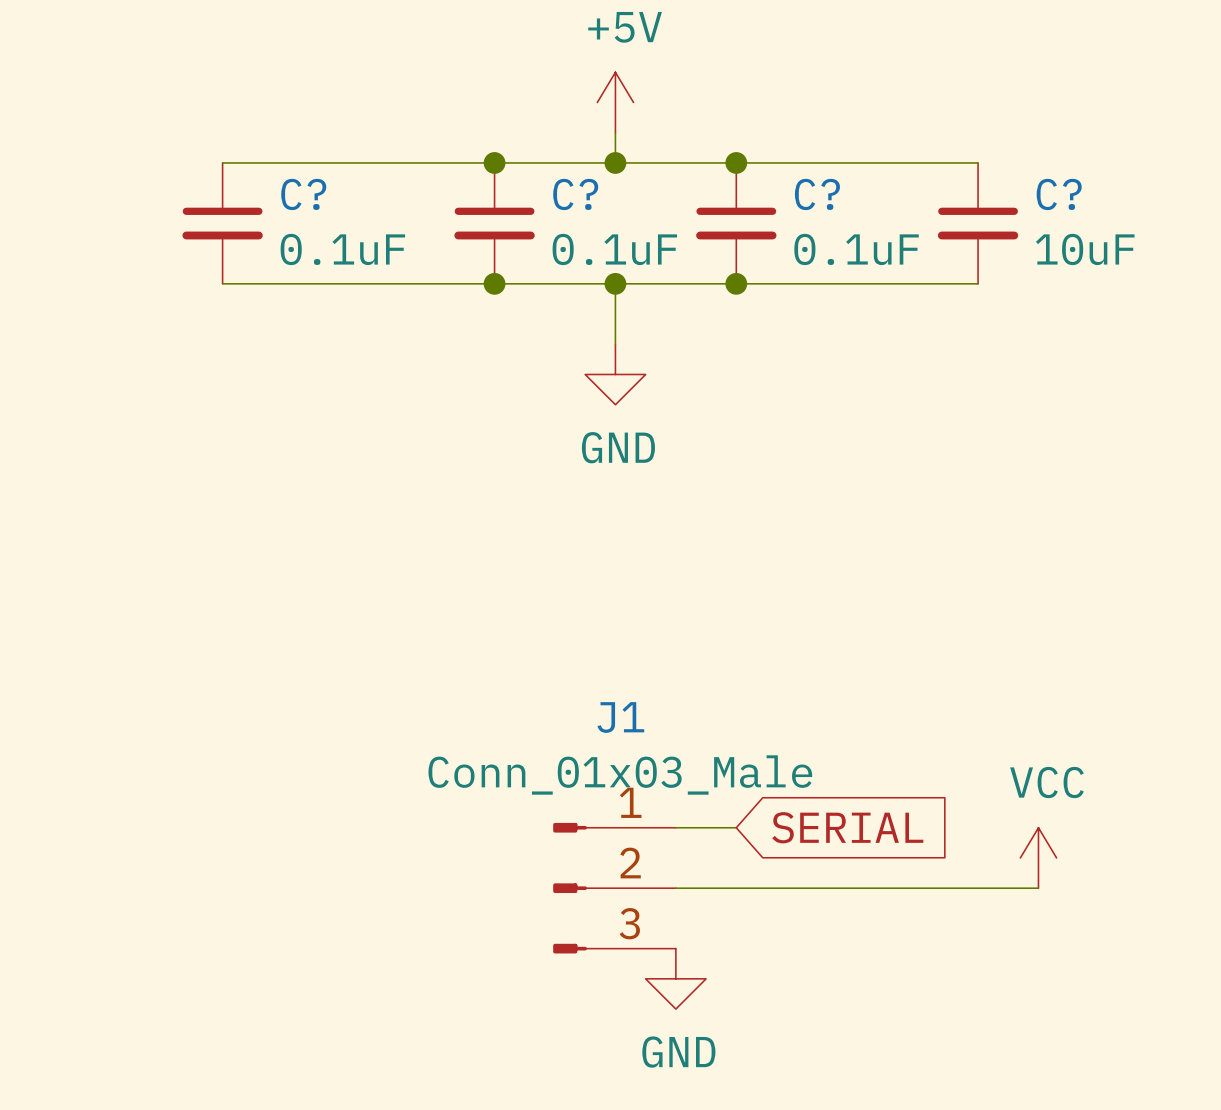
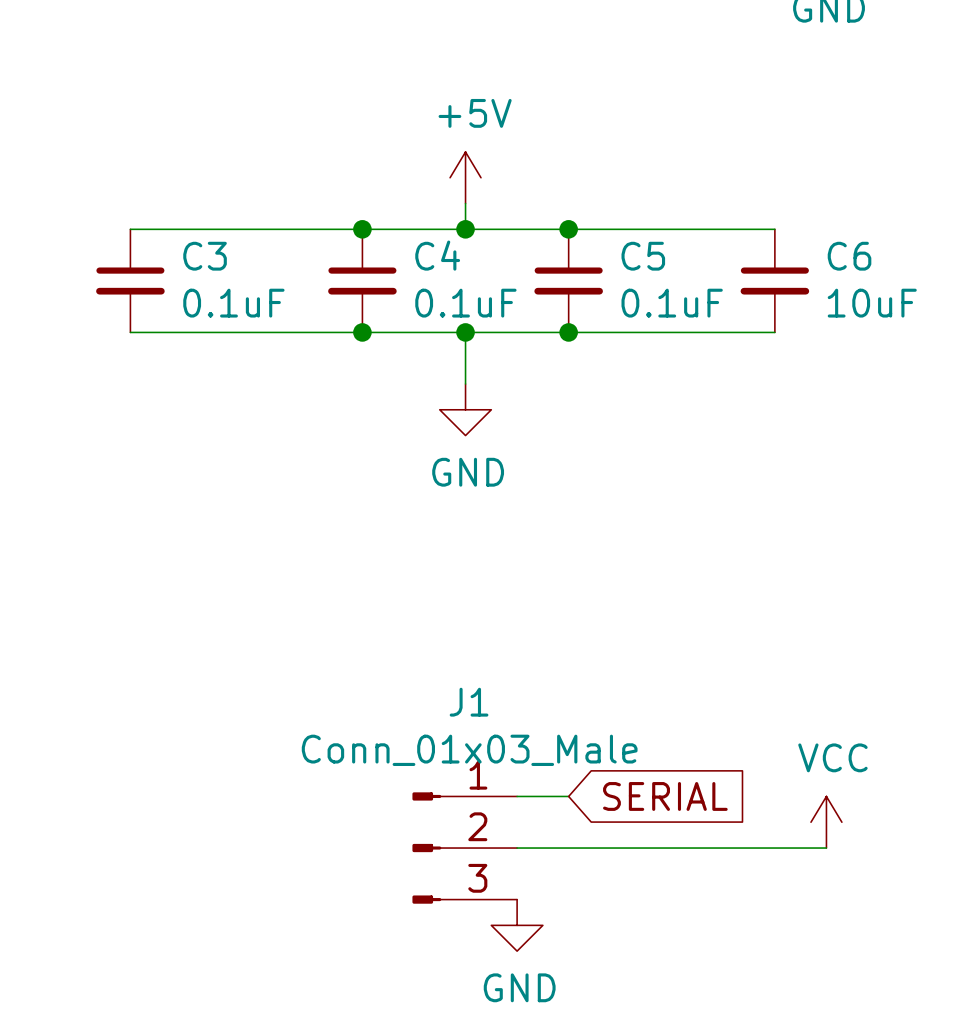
C? name: C? (303, 194) -> C3 (205, 256)
C? name: C? (575, 194) -> C4 (437, 255)
C? name: C? (817, 194) -> C5 (643, 256)
C? name: C? (1059, 194) -> C6 (849, 256)

